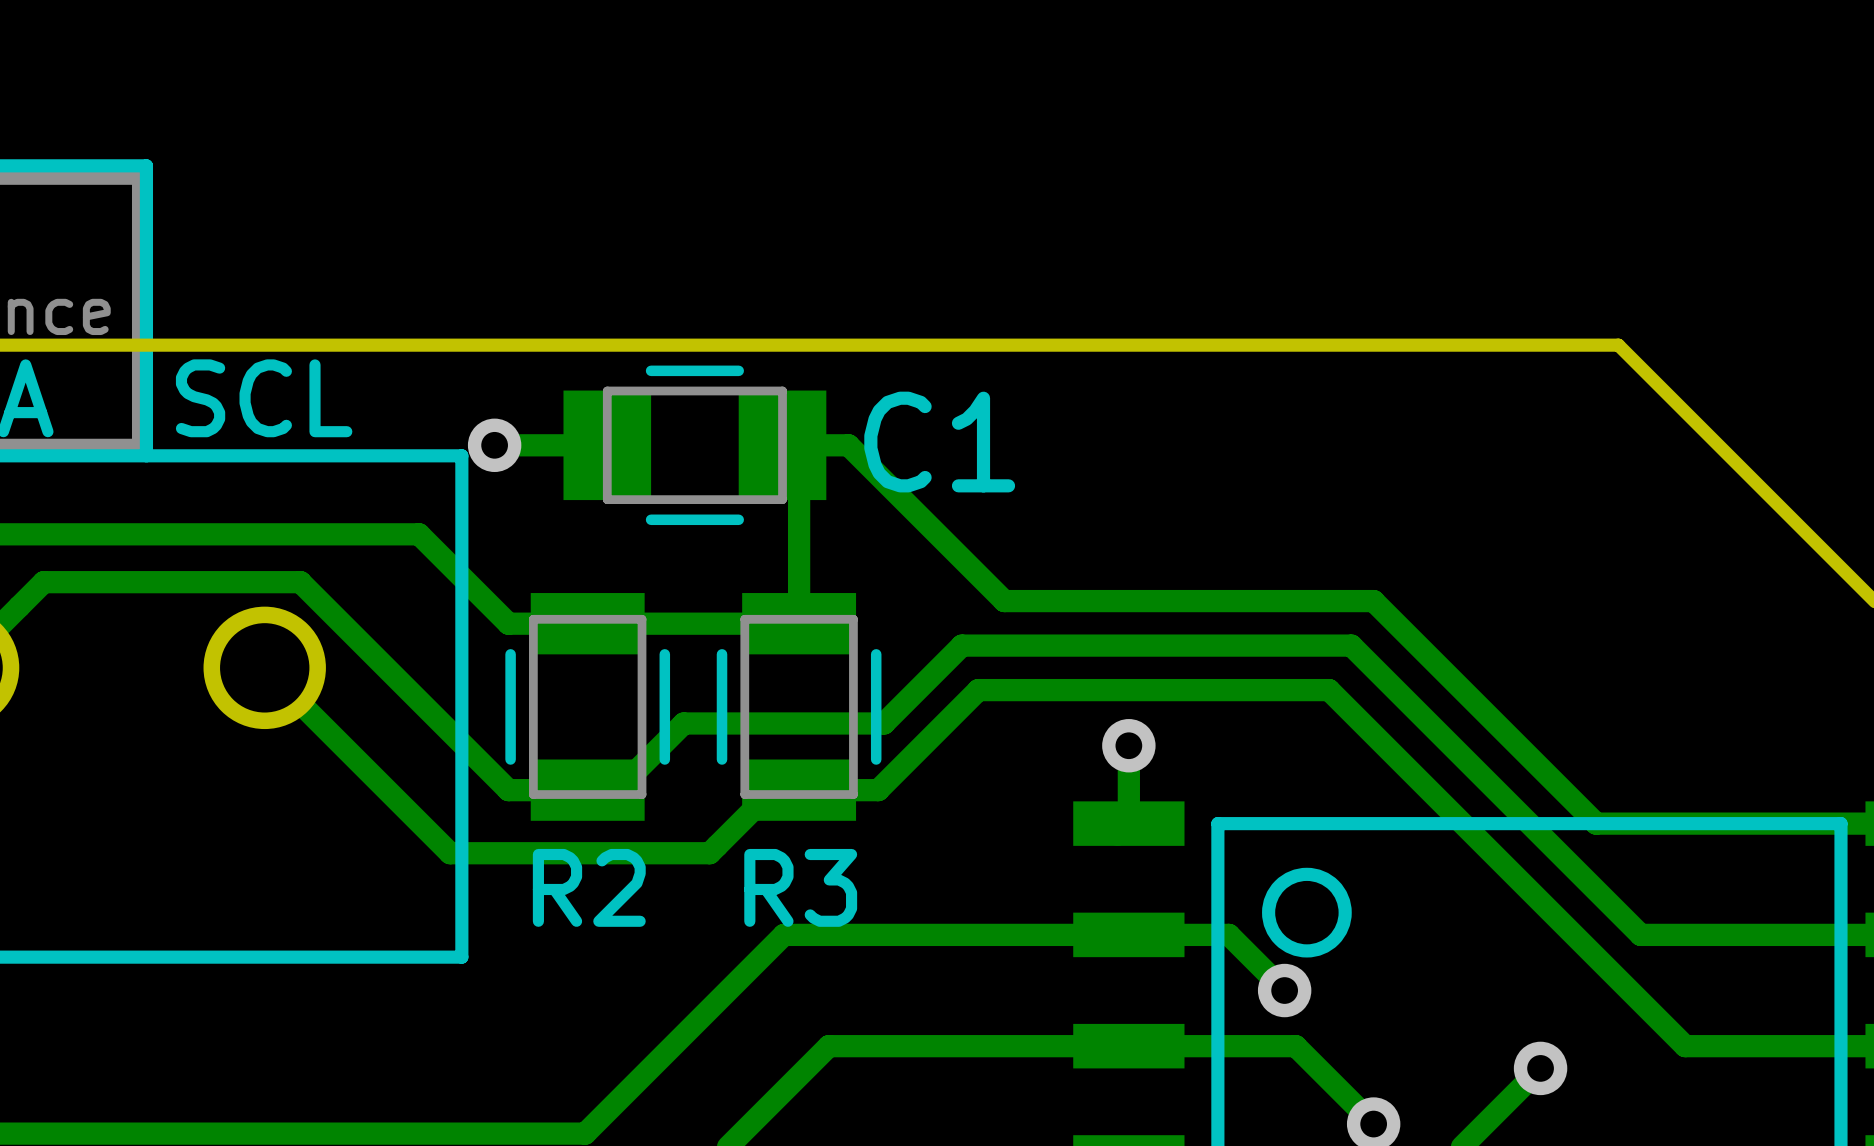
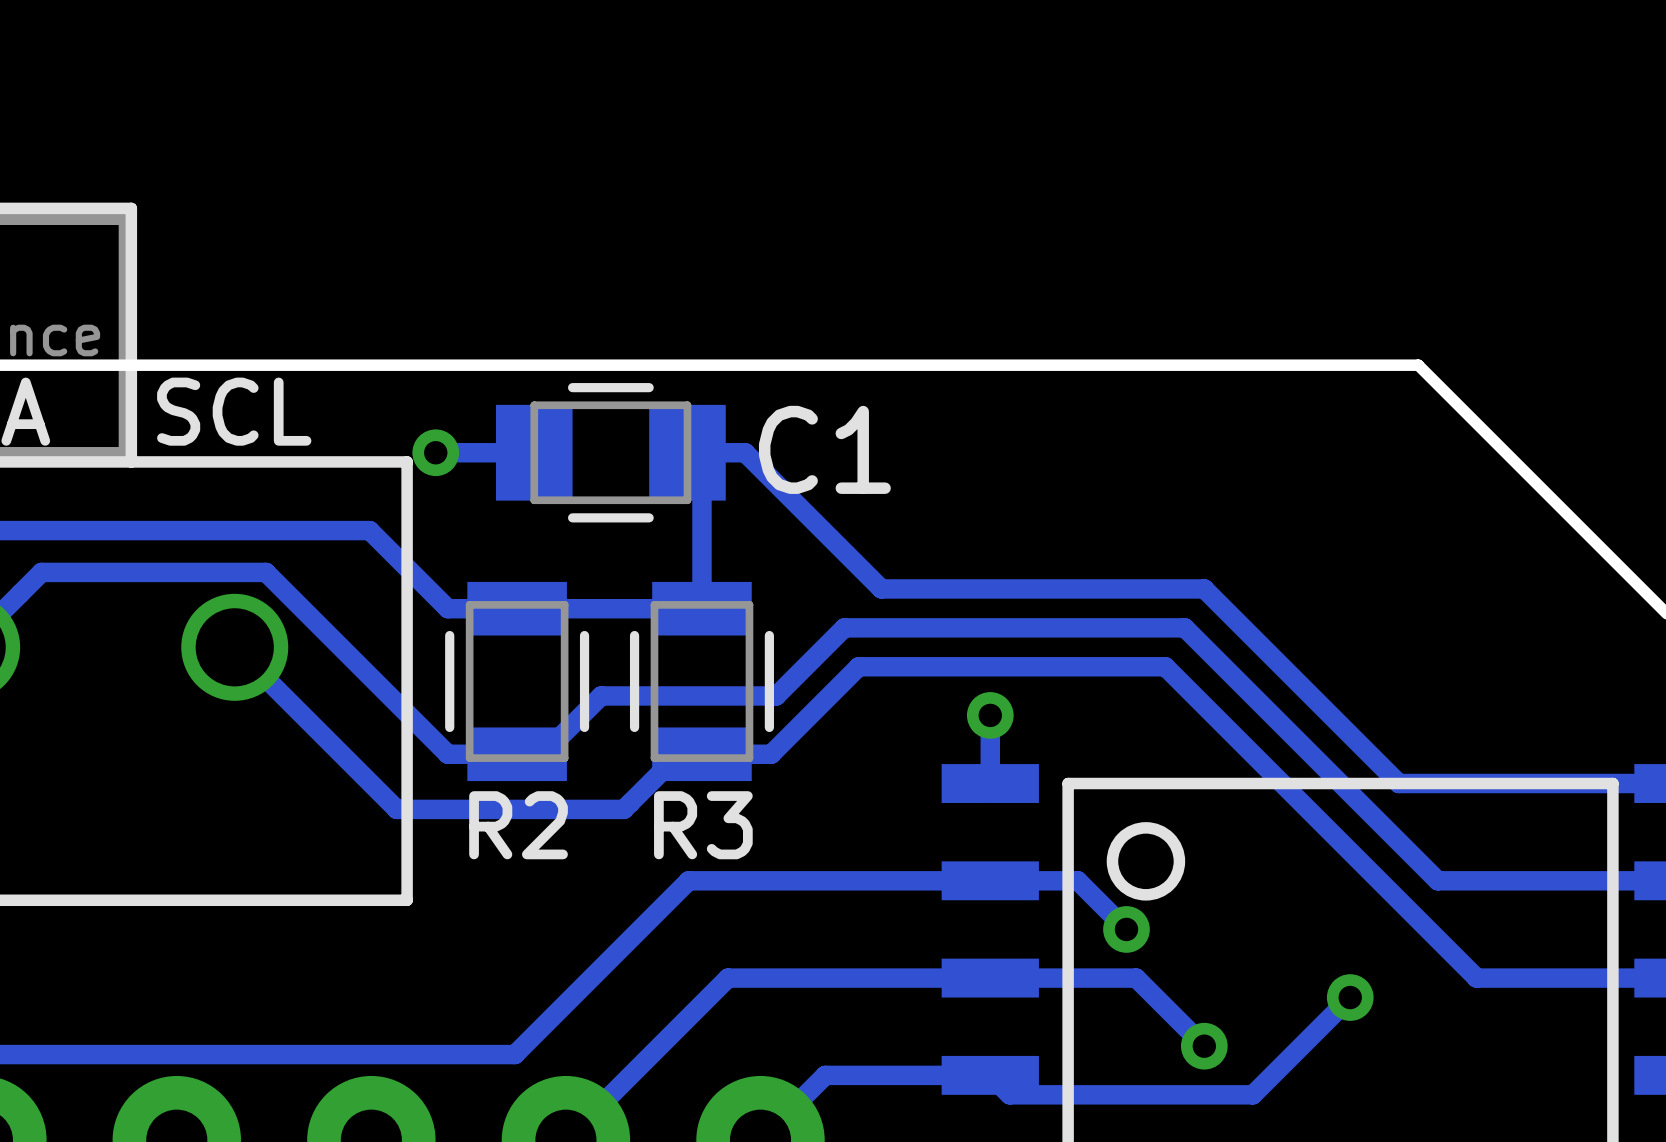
R2 name position: R2 (589, 887) -> R2 (518, 825)
R3 name position: R3 (800, 887) -> R3 (703, 825)

